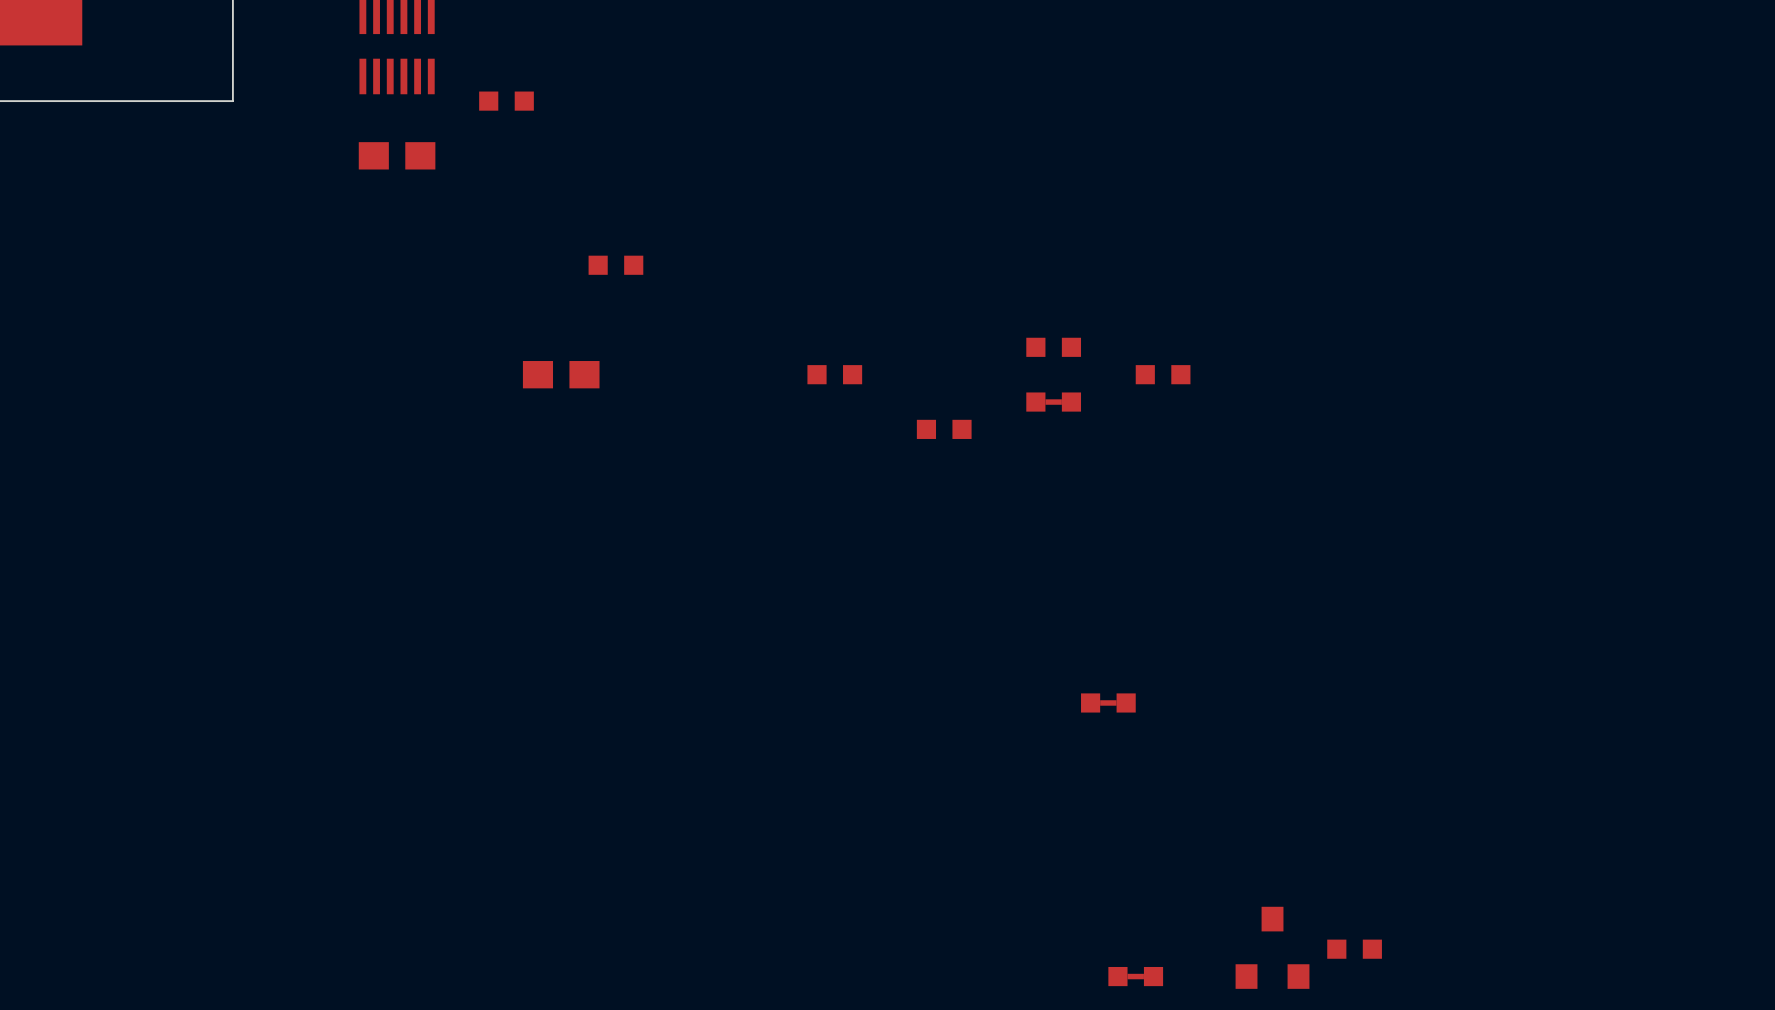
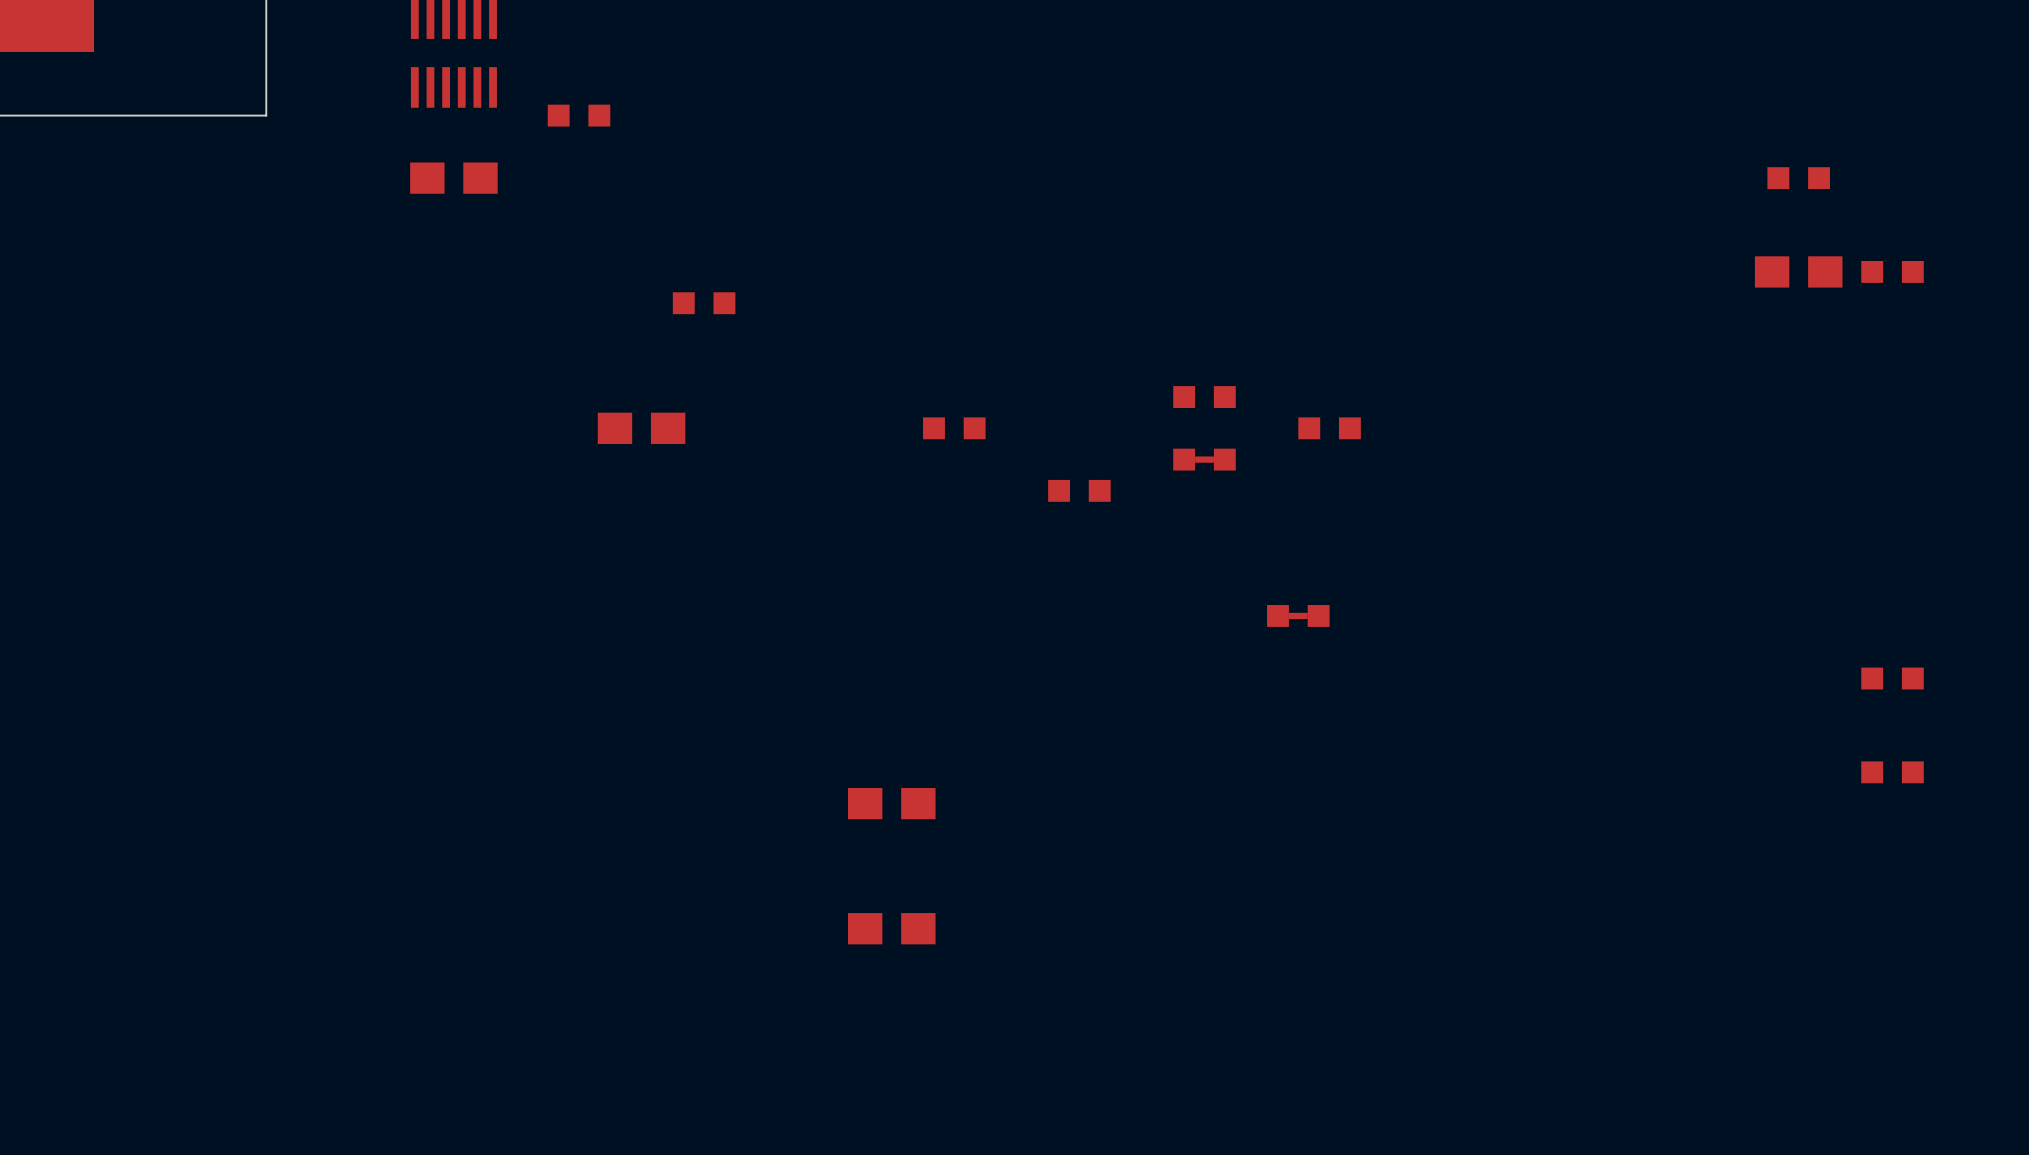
part: none -> (1798, 178)
part: none -> (1798, 271)
part: none -> (1892, 271)
part: none -> (1892, 678)
part: none -> (1892, 772)
part: none -> (891, 803)
part position: (1108, 702) -> (1298, 615)
part: none -> (891, 928)
part: (1272, 947) -> none
part: (1354, 949) -> none
part: (1135, 976) -> none

